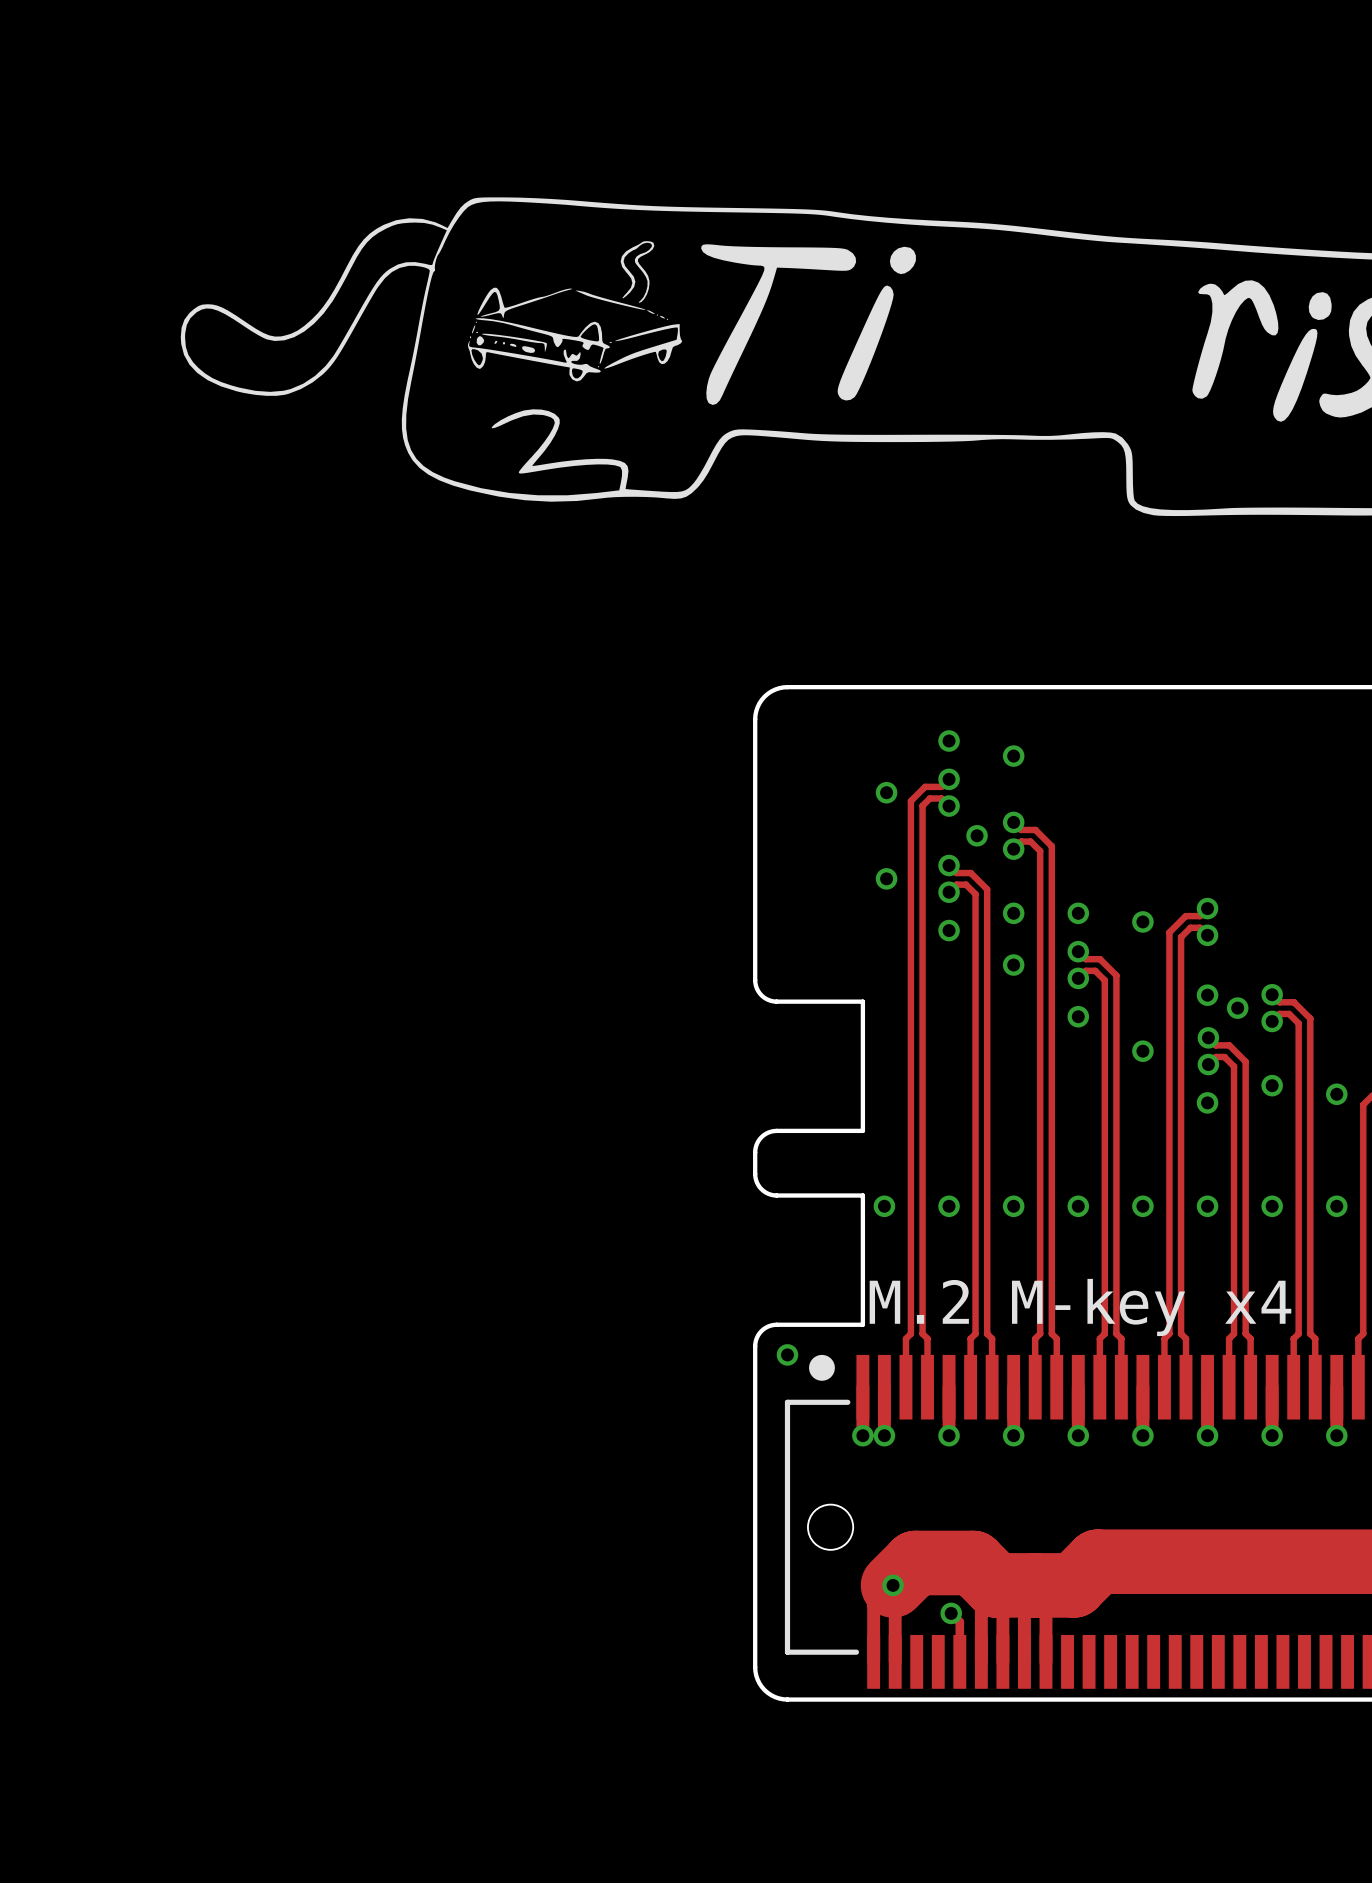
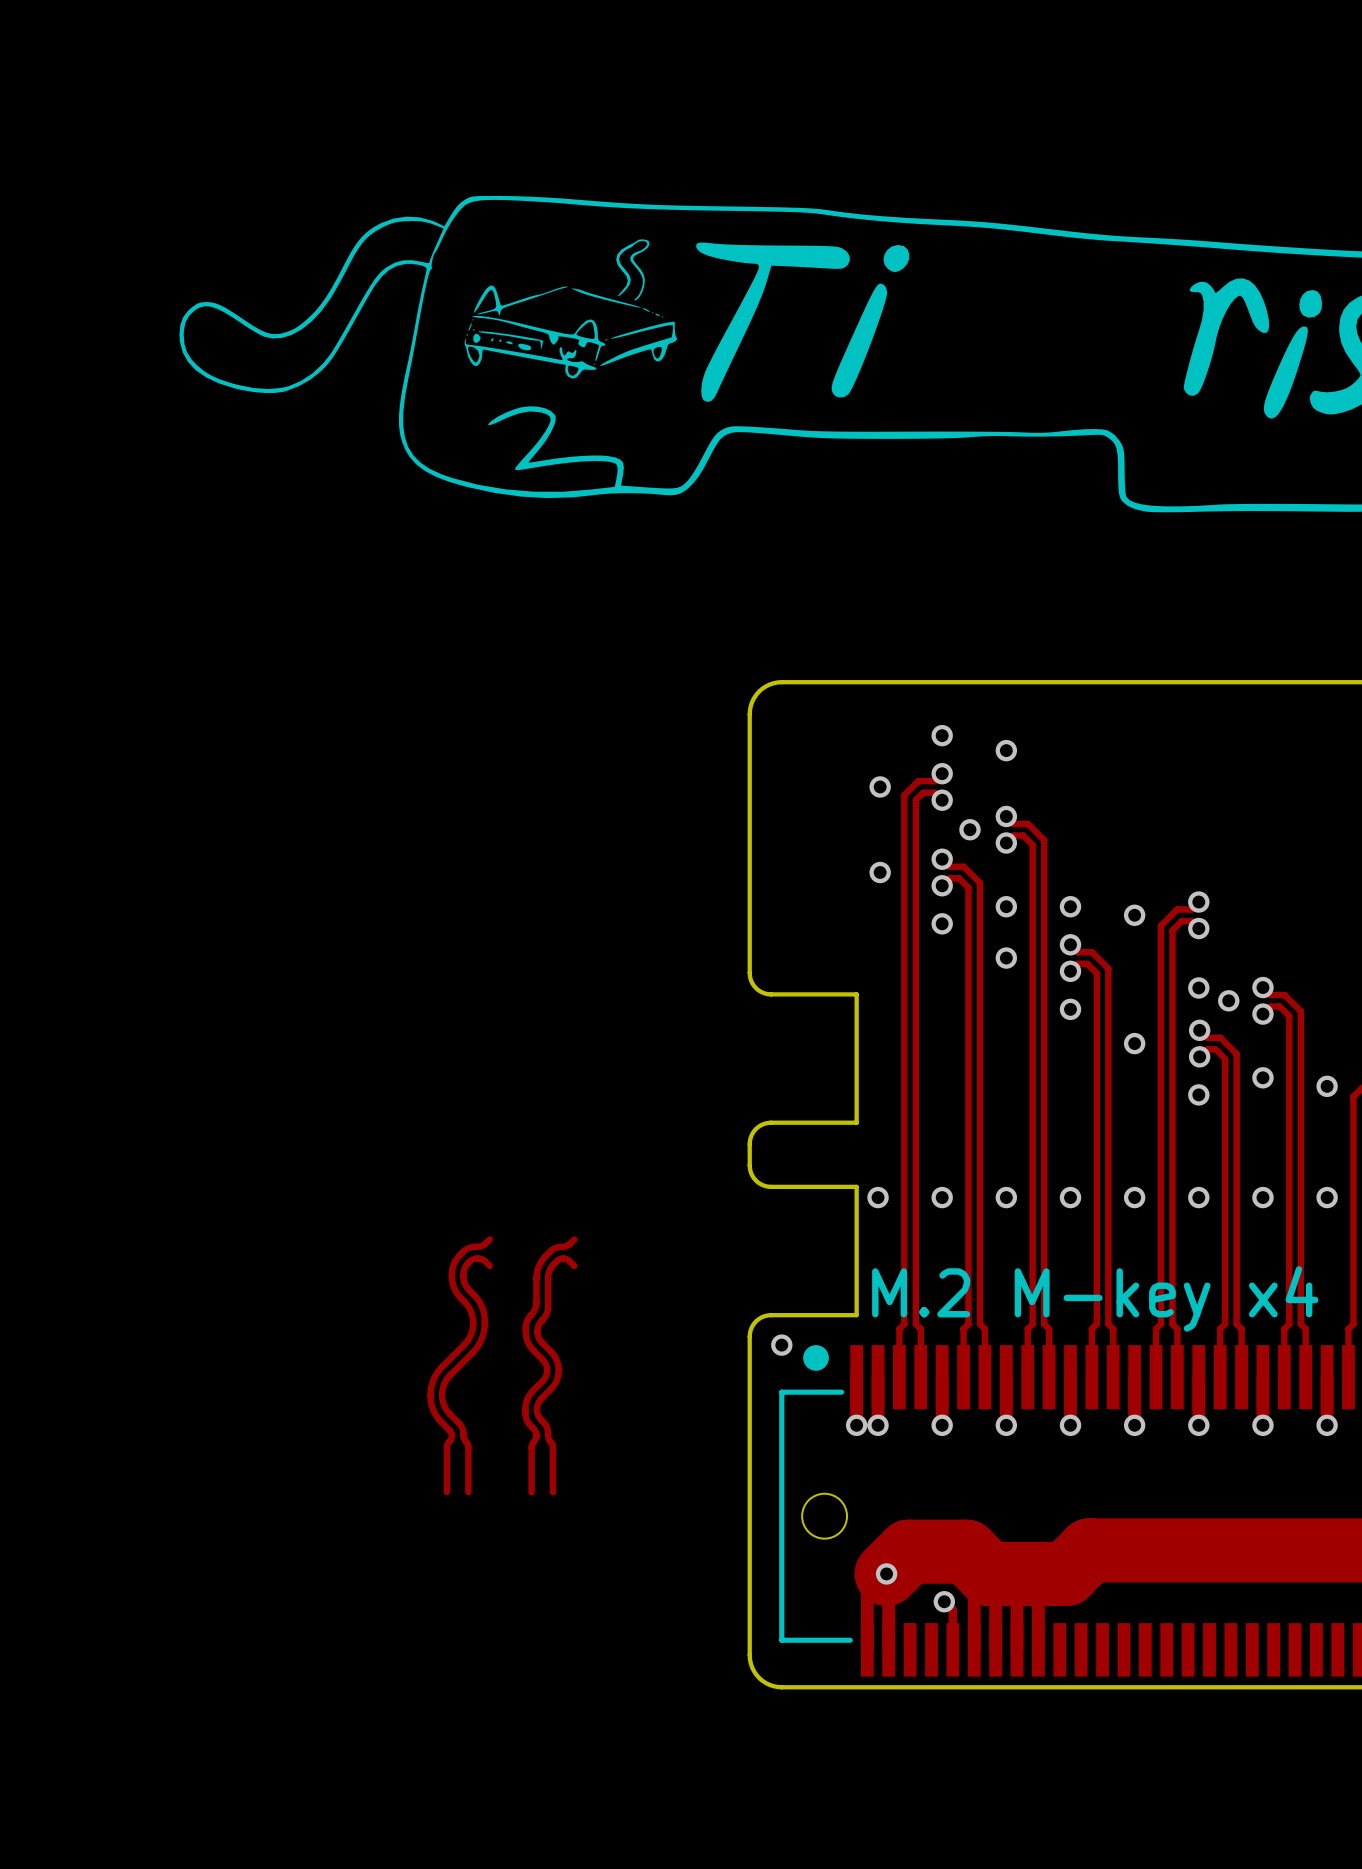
track: none -> (489, 1239) (481, 1245) (465, 1249) (454, 1263) (451, 1274) (453, 1285) (470, 1311) (473, 1327) (467, 1341) (437, 1372) (432, 1383) (430, 1394)
track: none -> (574, 1239) (567, 1245) (561, 1246)
track: none -> (560, 1246) (551, 1250) (538, 1266) (536, 1275) (535, 1306) (525, 1326) (529, 1344) (544, 1361) (547, 1368) (545, 1377) (530, 1393) (525, 1405) (526, 1419) (536, 1435)
track: none -> (489, 1265) (483, 1259) (476, 1258) (470, 1260) (464, 1268) (464, 1281) (482, 1306) (484, 1328) (476, 1348) (447, 1377) (442, 1391) (444, 1405) (461, 1426) (463, 1438) (467, 1445) (468, 1492)
track: none -> (574, 1265) (568, 1259) (562, 1258) (557, 1260) (550, 1268) (548, 1276) (547, 1311) (537, 1330) (539, 1338) (553, 1354) (558, 1366) (555, 1383) (539, 1401) (536, 1409) (538, 1416) (546, 1427) (548, 1438) (552, 1445) (552, 1492)
track: none -> (430, 1396) (434, 1413) (451, 1432) (449, 1441)
track: none -> (536, 1435) (531, 1446) (531, 1492)
track: none -> (449, 1441) (446, 1447) (446, 1492)

